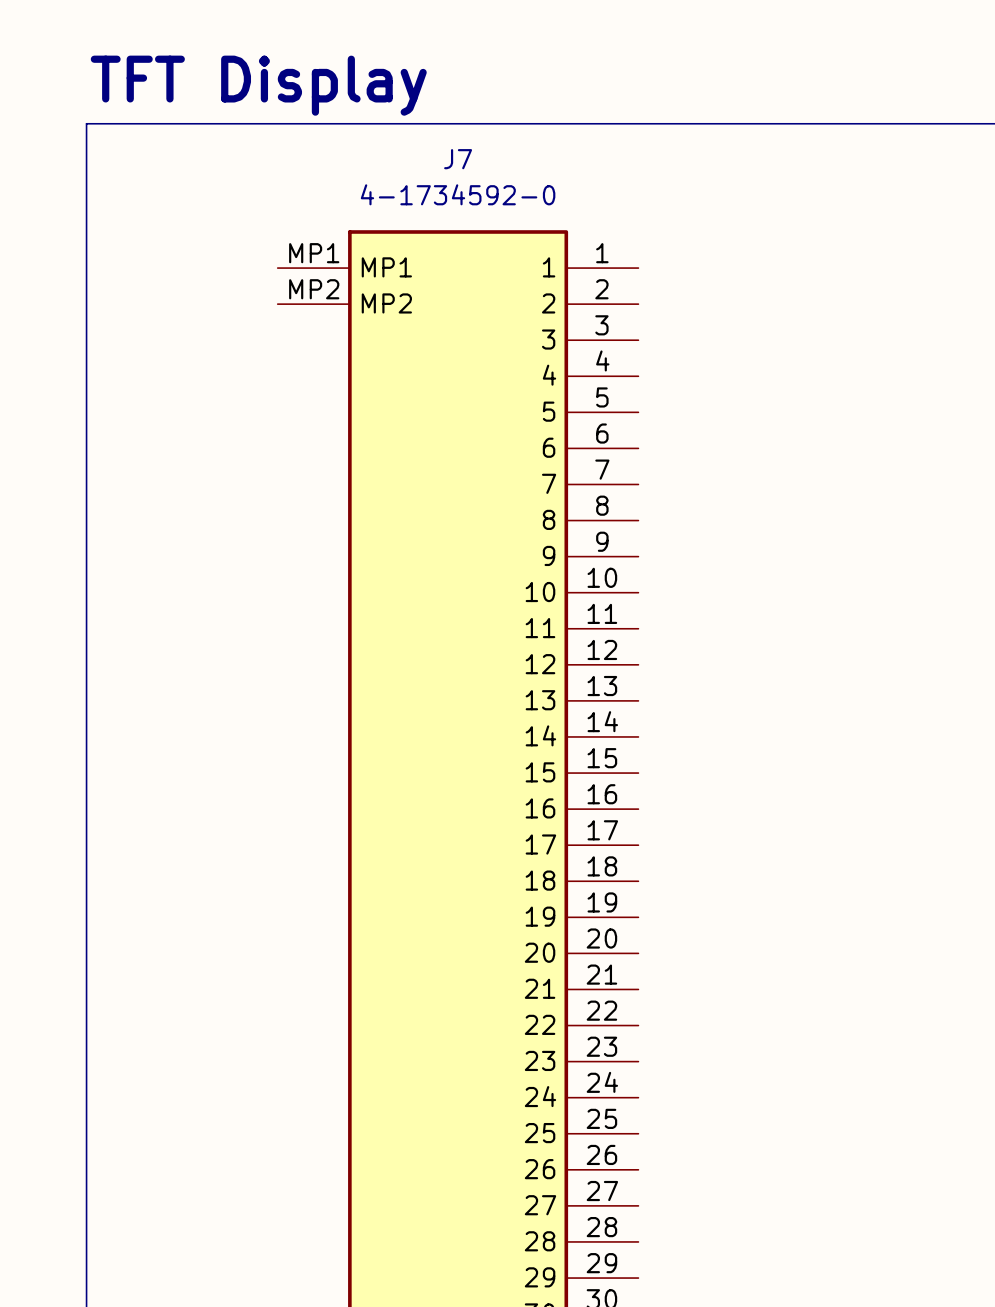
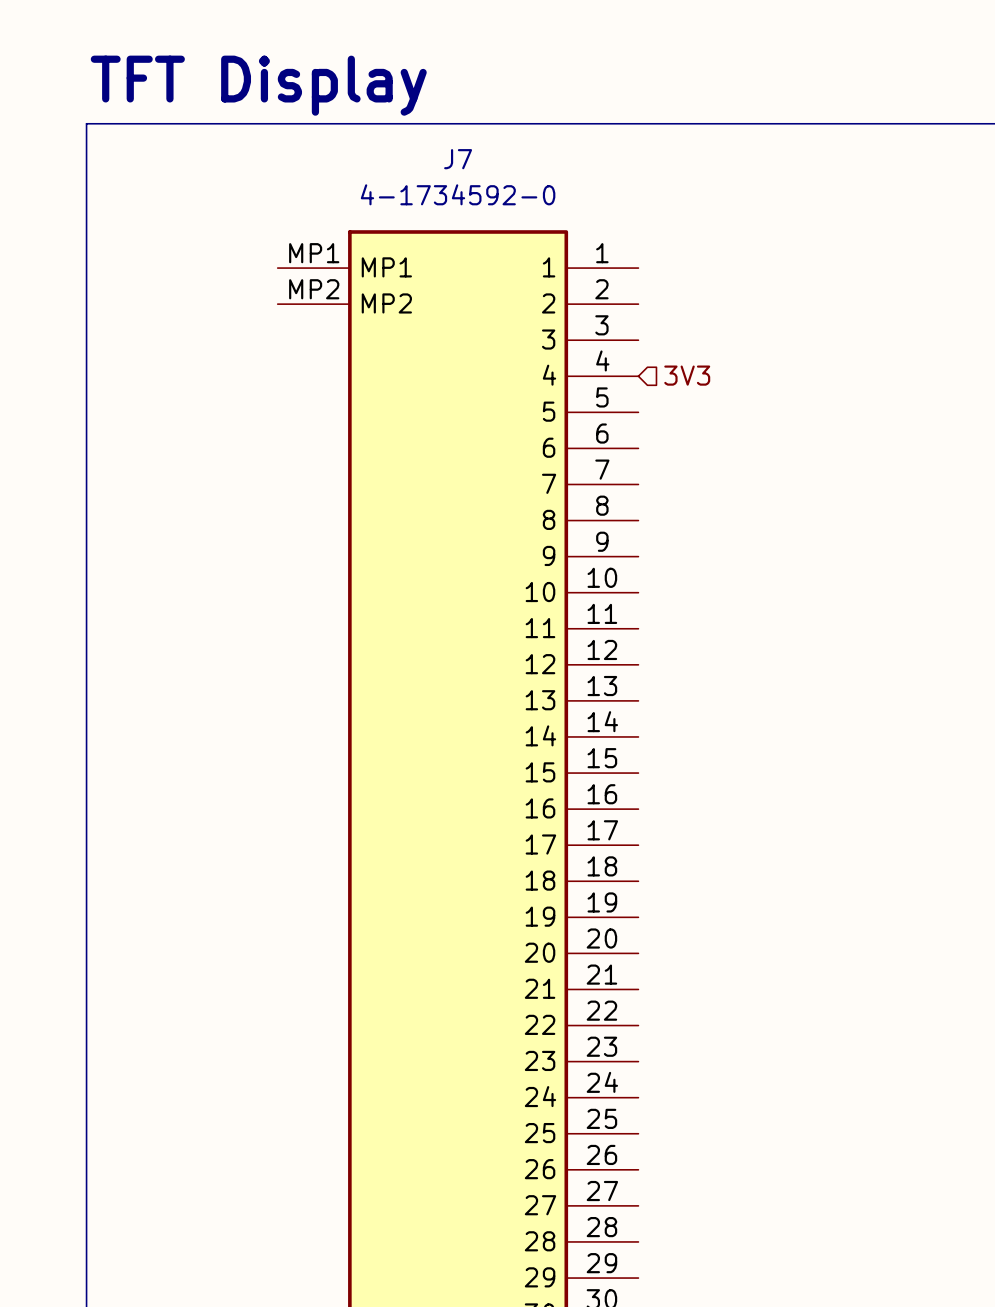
hierarchical label: none -> 3V3 (687, 375)

